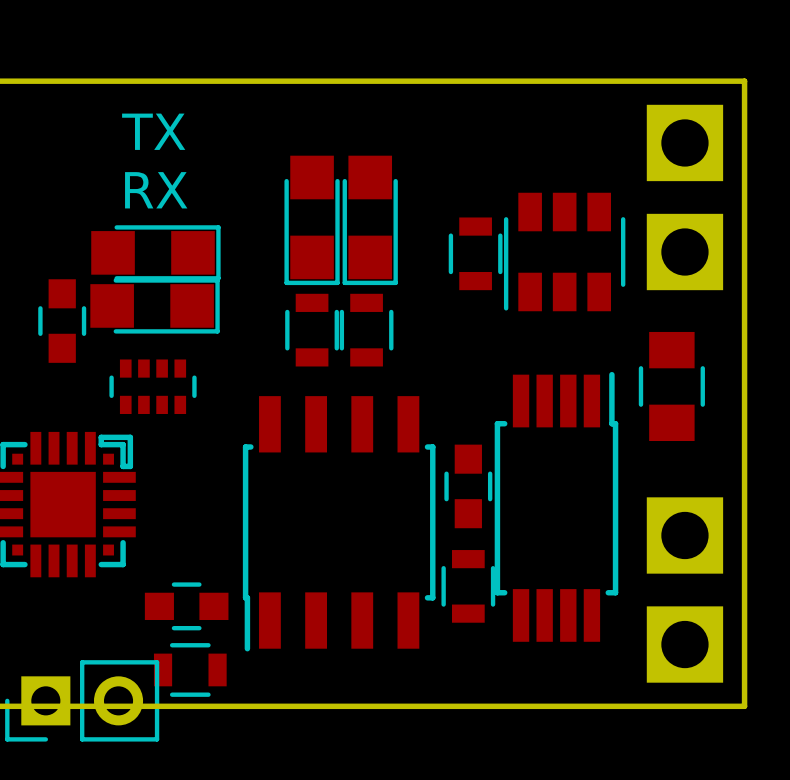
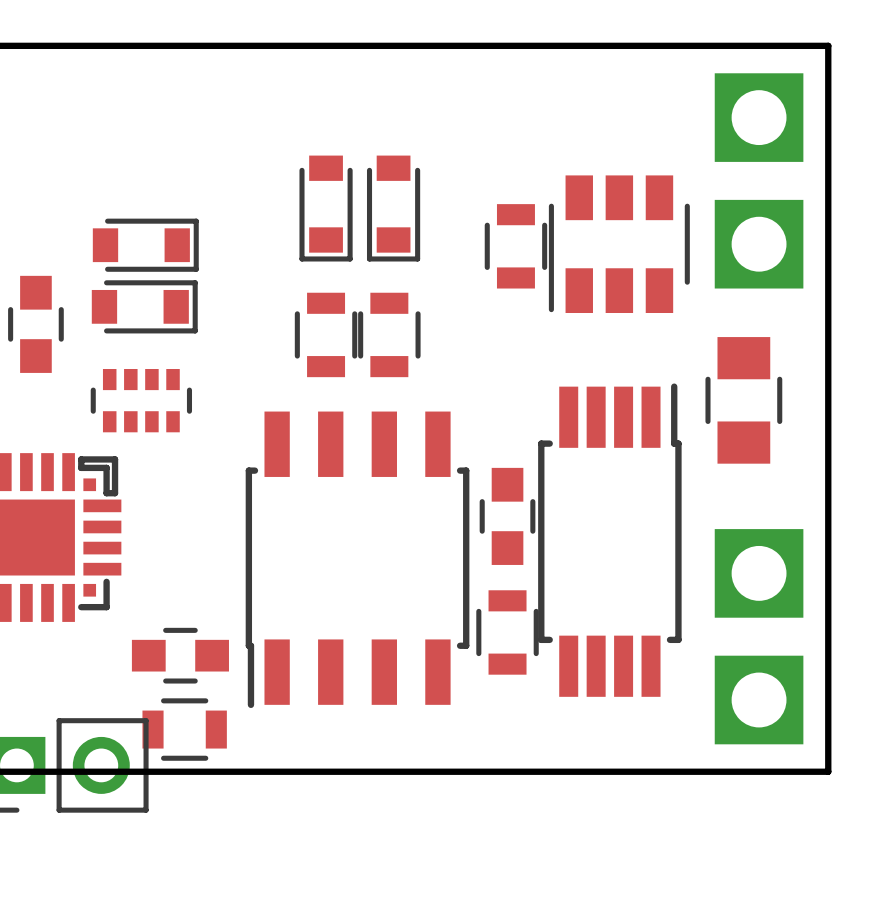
text: TX (153, 131) -> none
part footprint: [284, 155, 340, 286] -> [299, 155, 353, 262]
part footprint: [342, 155, 398, 286] -> [366, 155, 421, 262]
text: RX (156, 190) -> none
part footprint: [91, 225, 221, 281] -> [92, 218, 199, 272]
part footprint: [90, 278, 220, 334] -> [91, 280, 198, 334]

